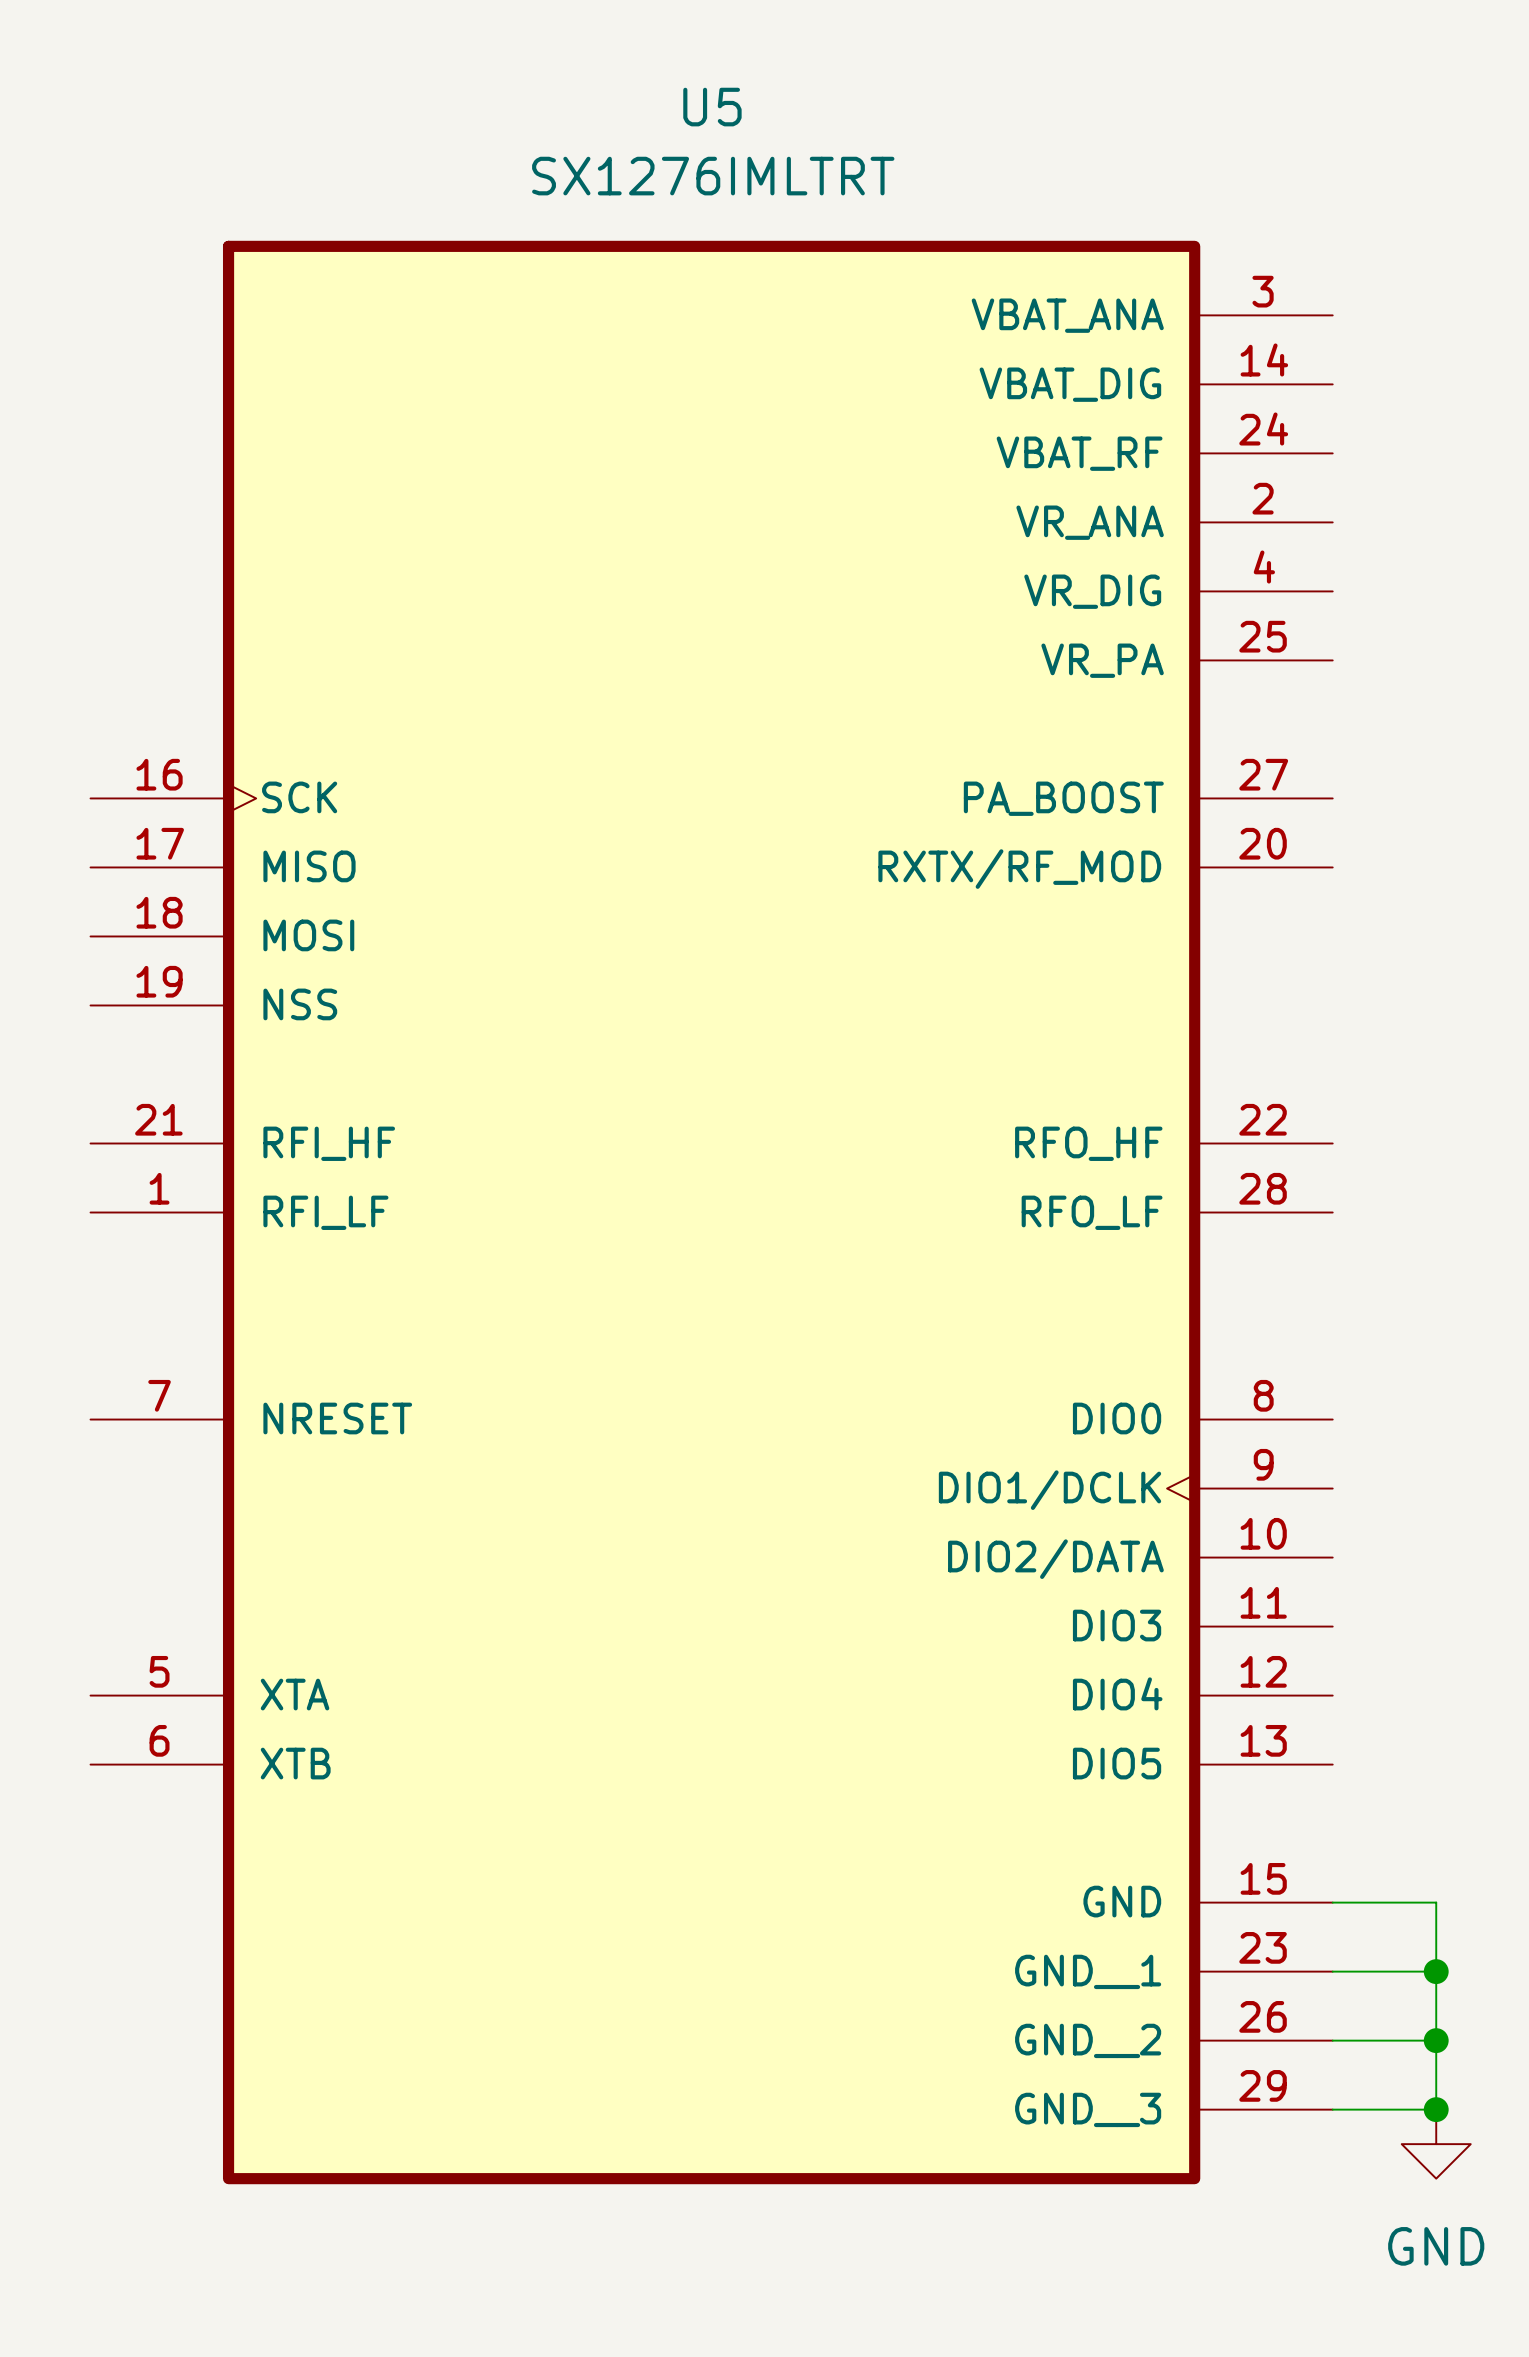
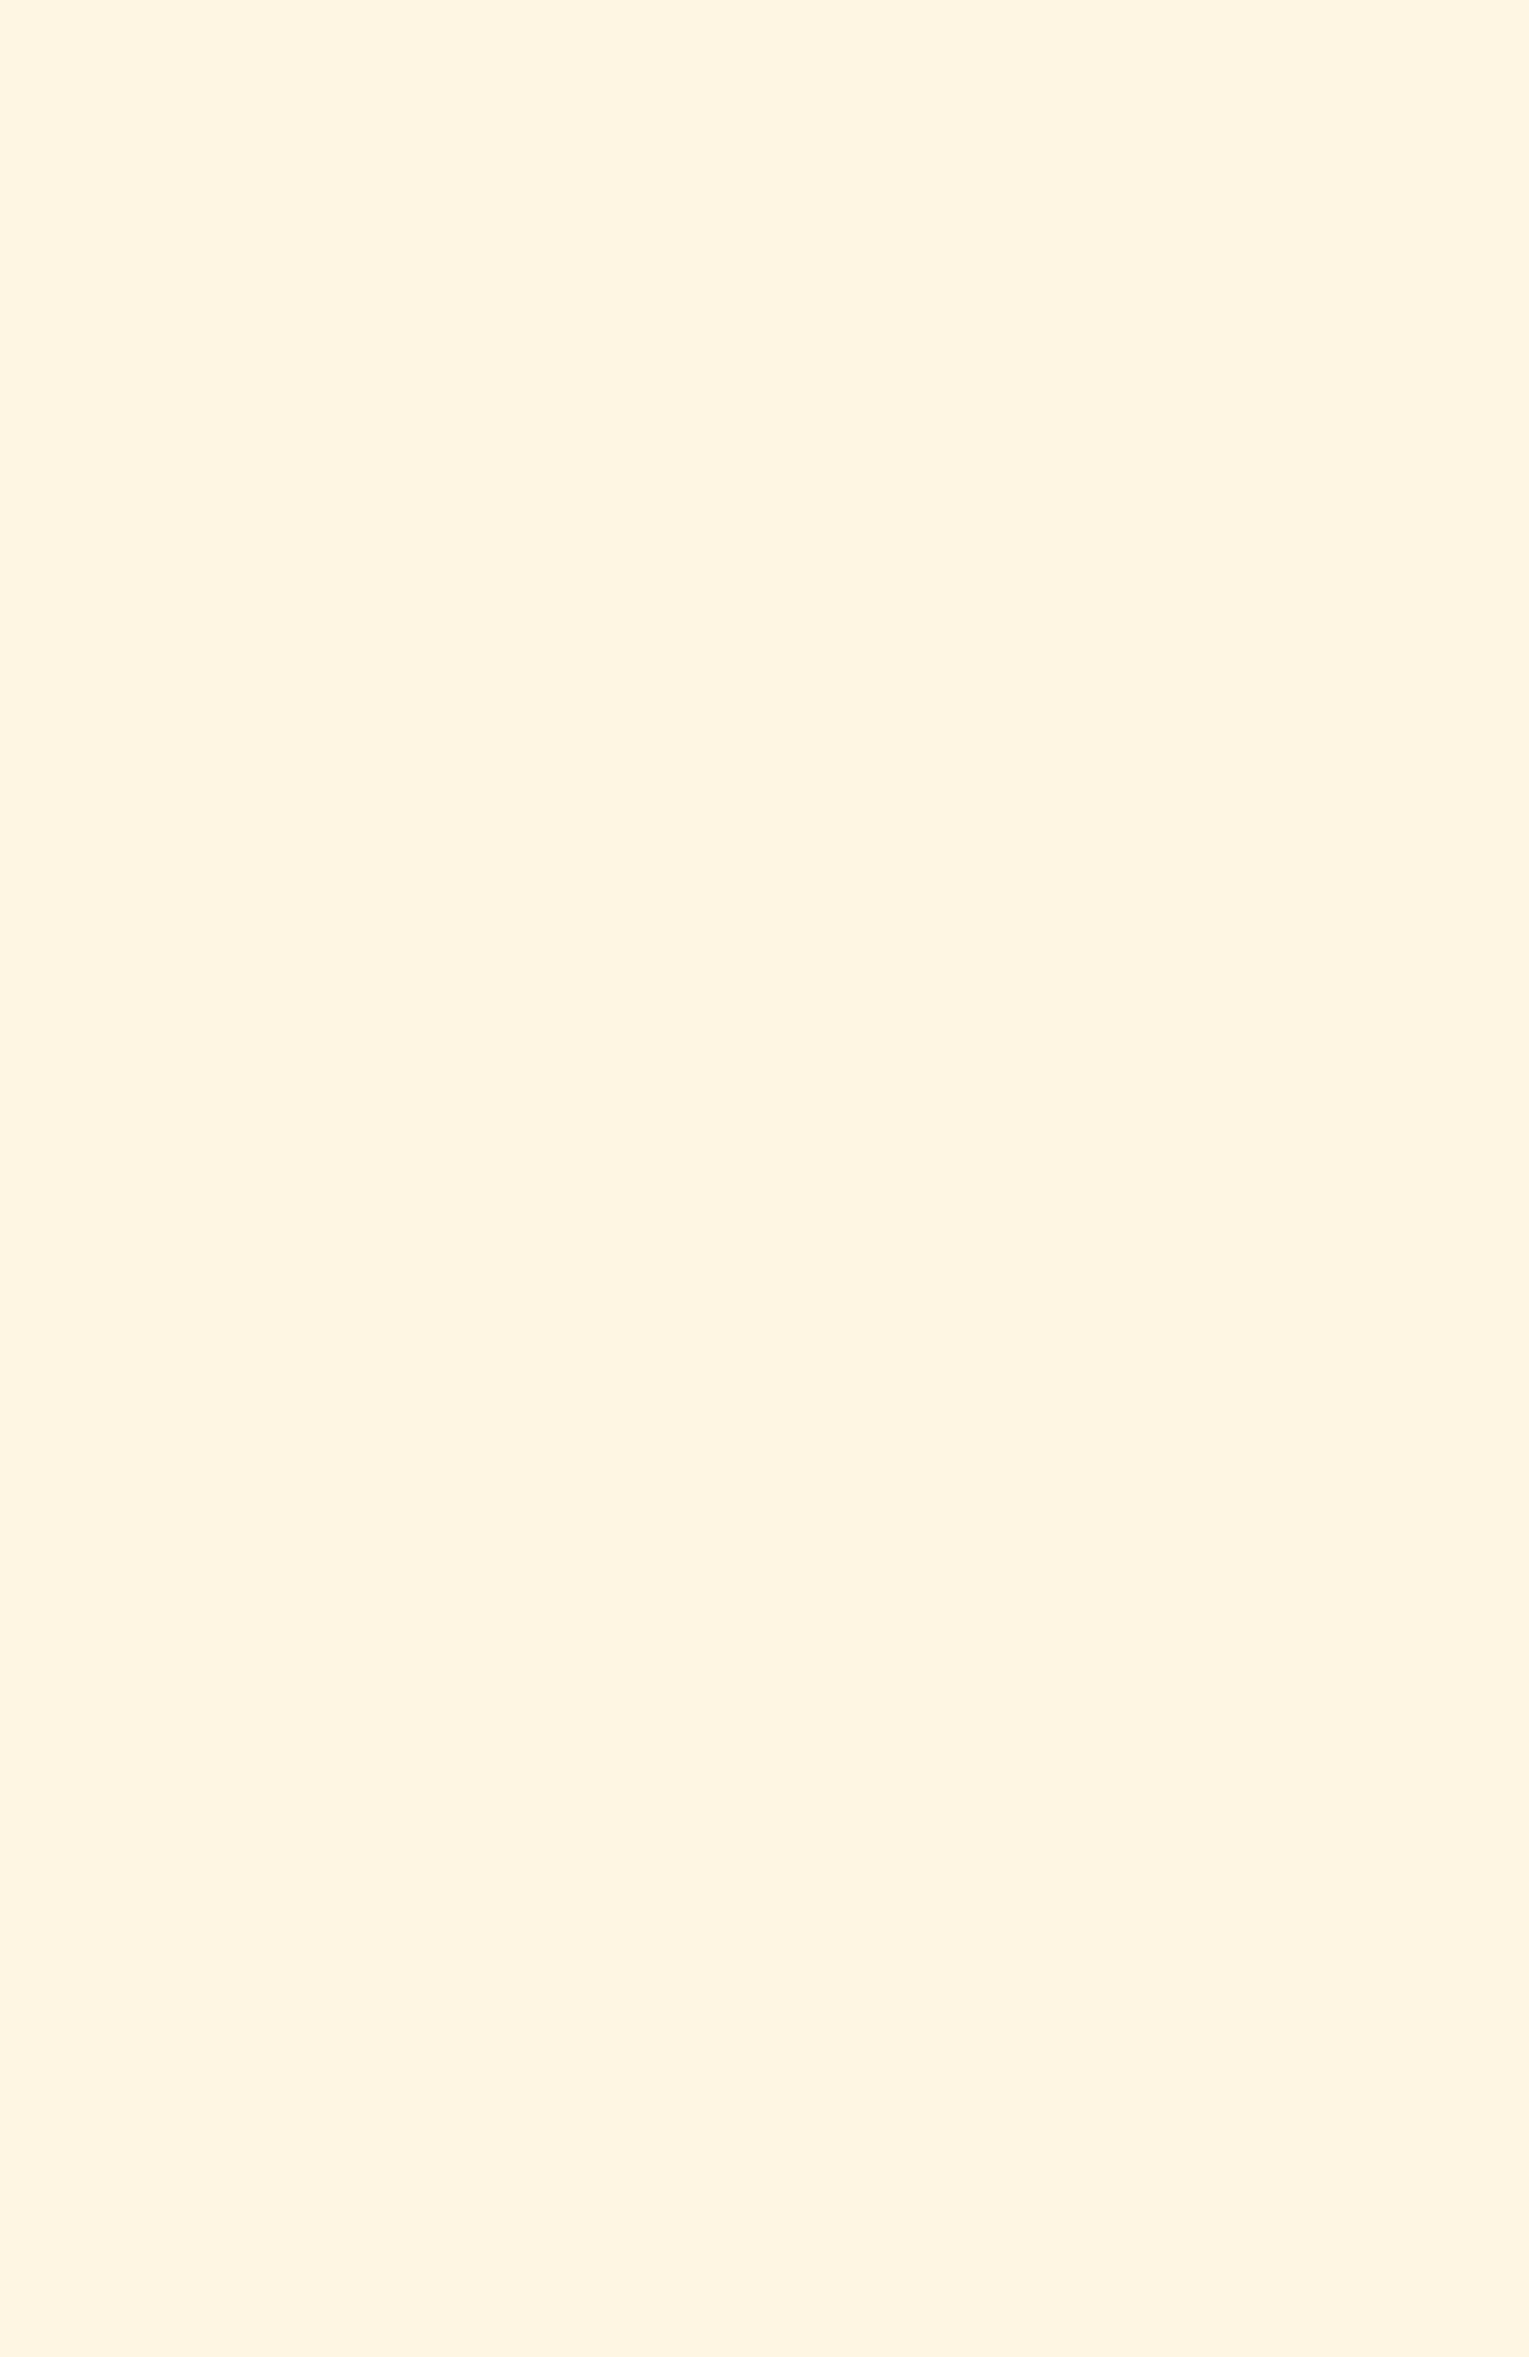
U5: SX1276IMLTRT (711, 1212) -> none
wire: (1332, 1902) (1436, 1902) (1436, 2109) (1332, 2109) -> none
wire: (1332, 1971) (1436, 1971) -> none
junction: (1436, 1971) -> none
wire: (1332, 2040) (1436, 2040) -> none
junction: (1436, 2040) -> none
junction: (1436, 2109) -> none
power symbol: GND (1436, 2144) -> none

